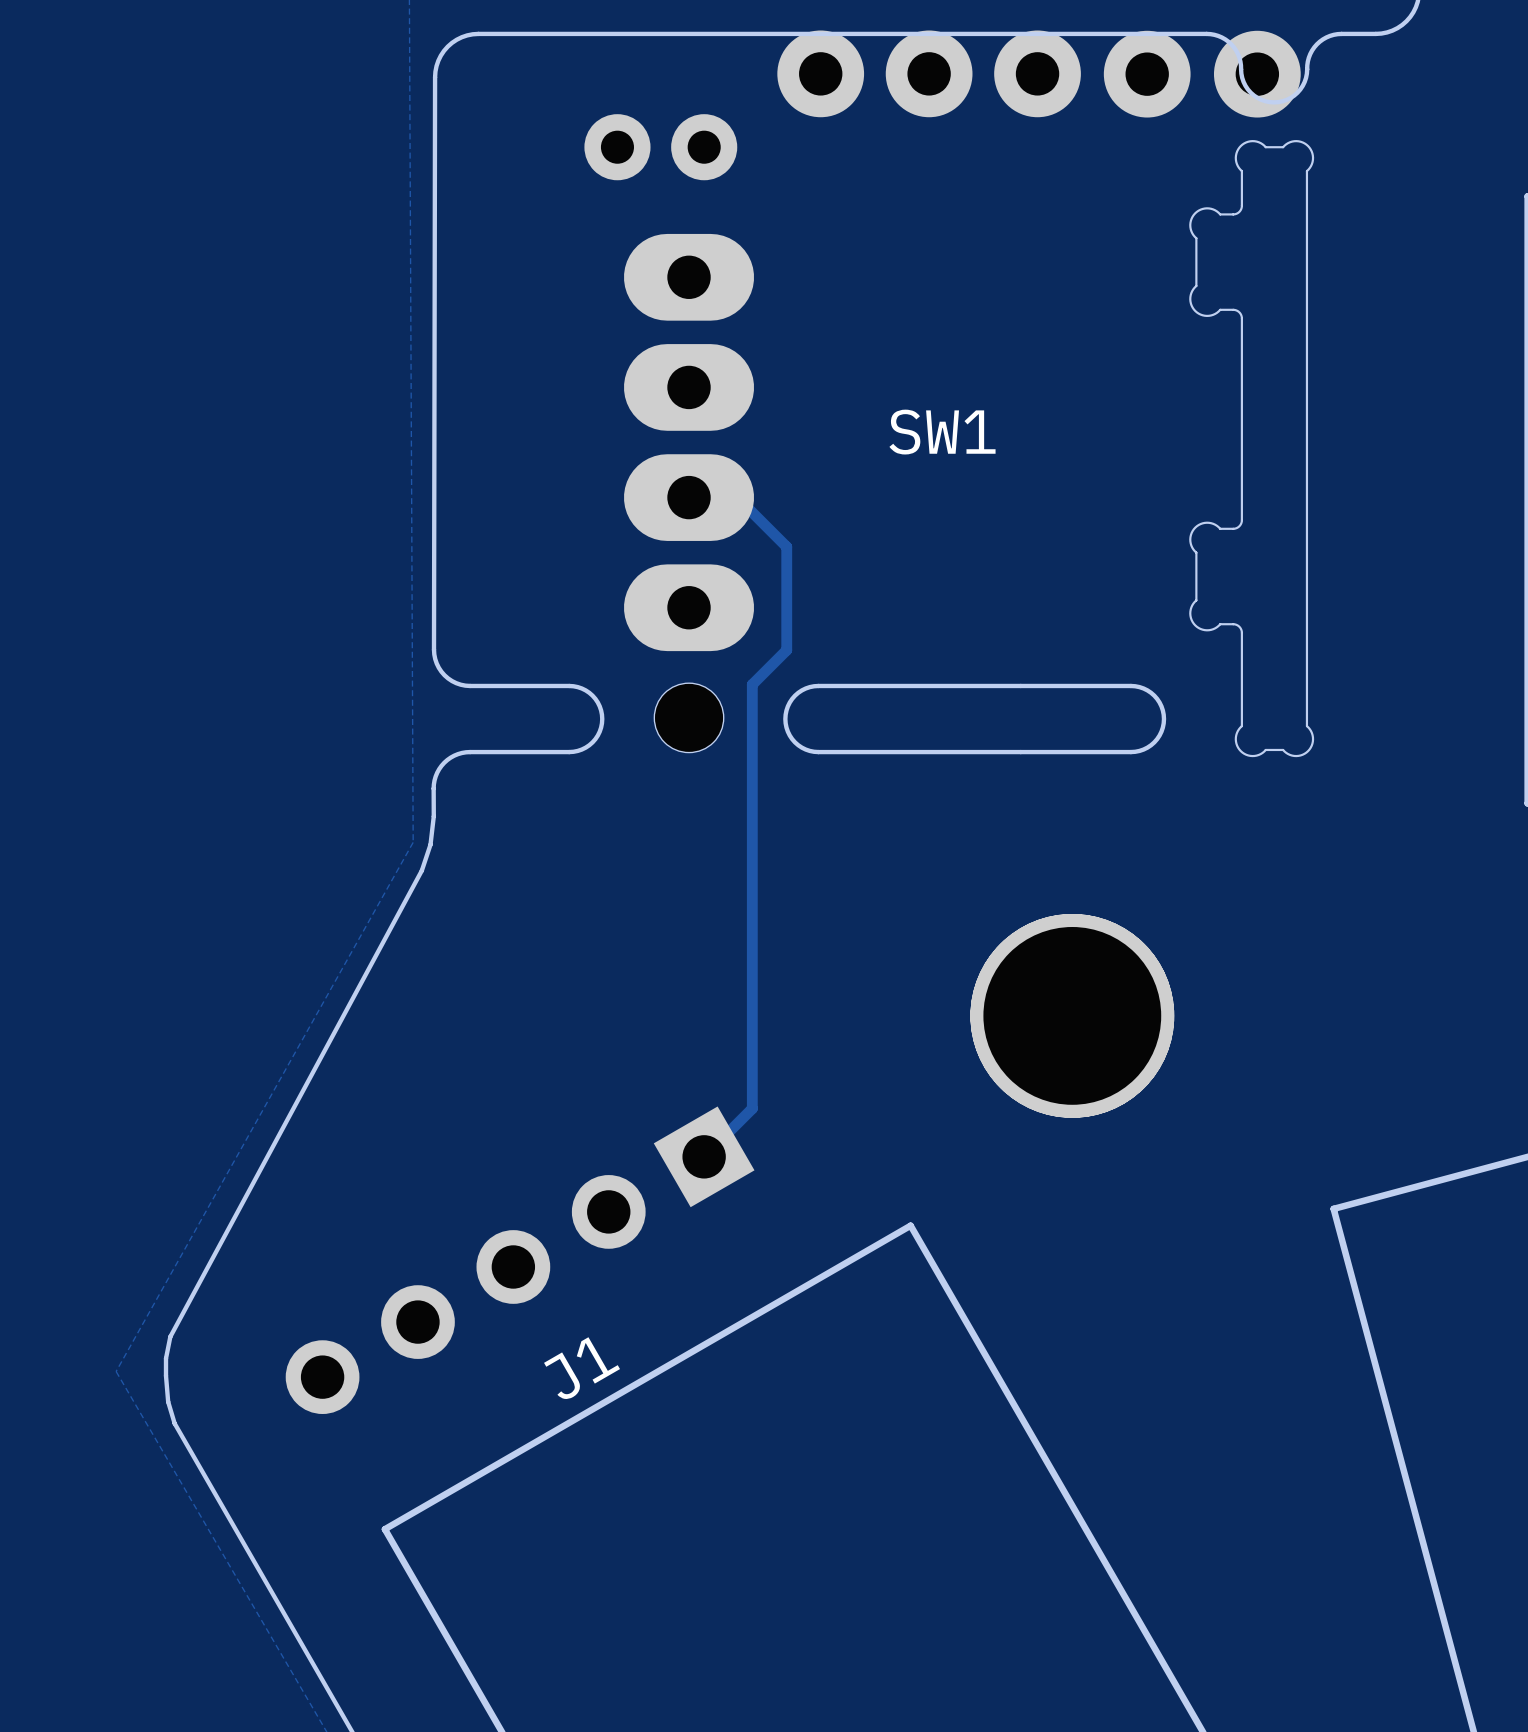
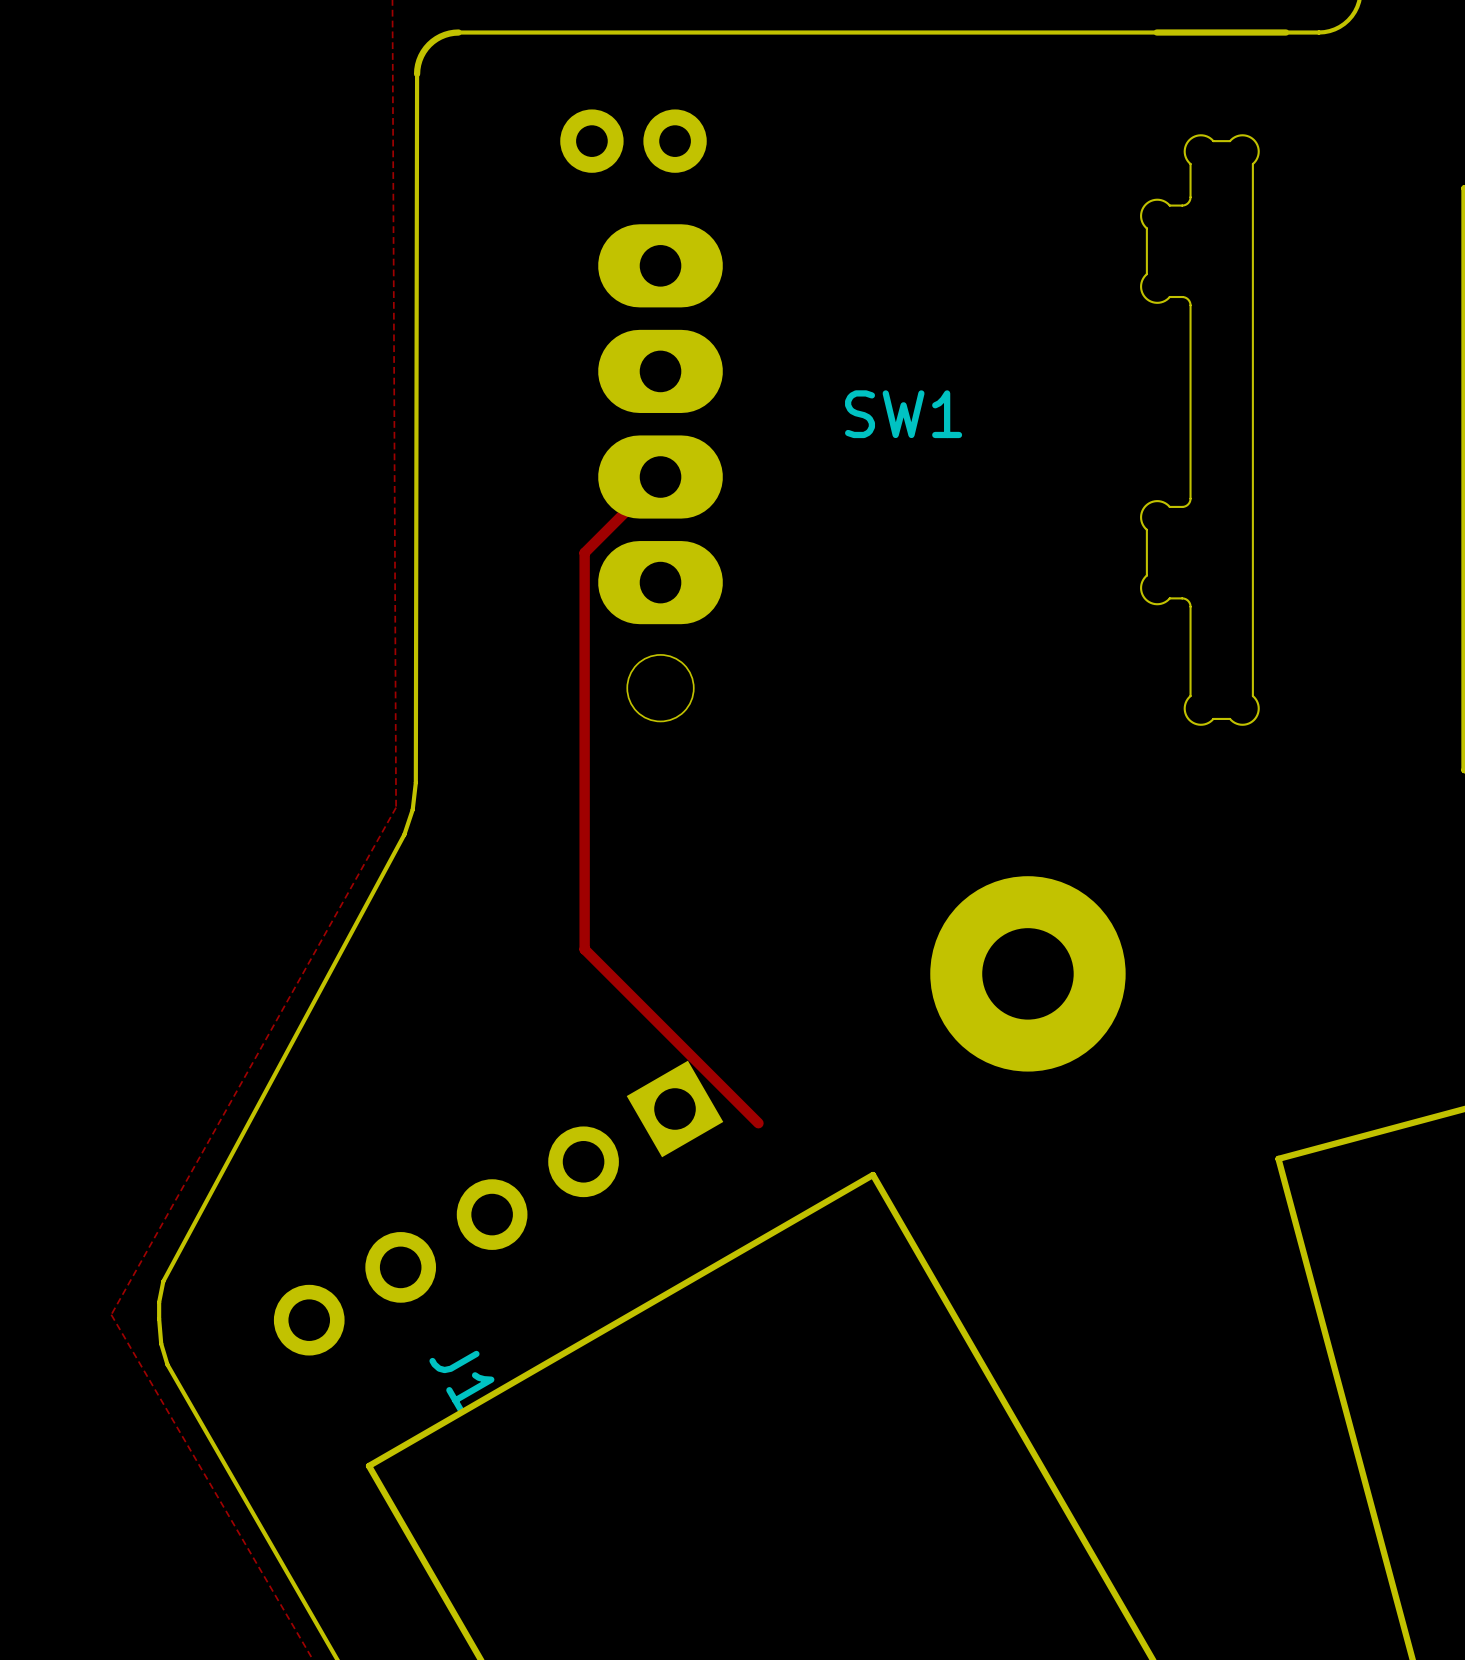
board edge: (478, 33) (461, 37) (447, 46) (438, 60) (435, 71) (434, 654) (441, 671) (448, 678) (460, 684) (569, 685) (581, 688) (595, 698) (599, 706) (602, 719) (599, 731) (595, 739) (589, 745) (577, 750) (470, 752) (450, 757) (441, 765) (435, 776) (433, 816) -> (458, 32) (444, 34) (432, 41) (423, 51) (417, 69) (415, 782)
board edge: (1206, 33) (1221, 37) (1231, 44) (1239, 57) (1242, 77) (1247, 89) (1261, 99) (1274, 102) (1286, 99) (1300, 89) (1306, 77) (1308, 57) (1316, 44) (1330, 35) (1341, 33) -> (1156, 32) (1286, 32)
part: (820, 73) -> none
part: (929, 73) -> none
part: (1037, 73) -> none
part: (1147, 74) -> none
part: (1257, 74) -> none
track: (689, 497) (737, 497) (786, 546) (786, 650) (752, 684) (752, 1108) (704, 1156) -> (660, 477) (584, 552) (584, 949) (758, 1123)
board edge: (818, 685) (1135, 686) (1147, 690) (1157, 698) (1162, 710) (1163, 723) (1161, 731) (1154, 742) (1147, 747) (1135, 751) (814, 751) (801, 747) (792, 739) (786, 727) (785, 714) (789, 702) (798, 692) (809, 687) (818, 685) -> none
part: (1072, 1015) -> none
J1 name rotation: 0° (582, 1368) -> 90° clockwise (461, 1382)

